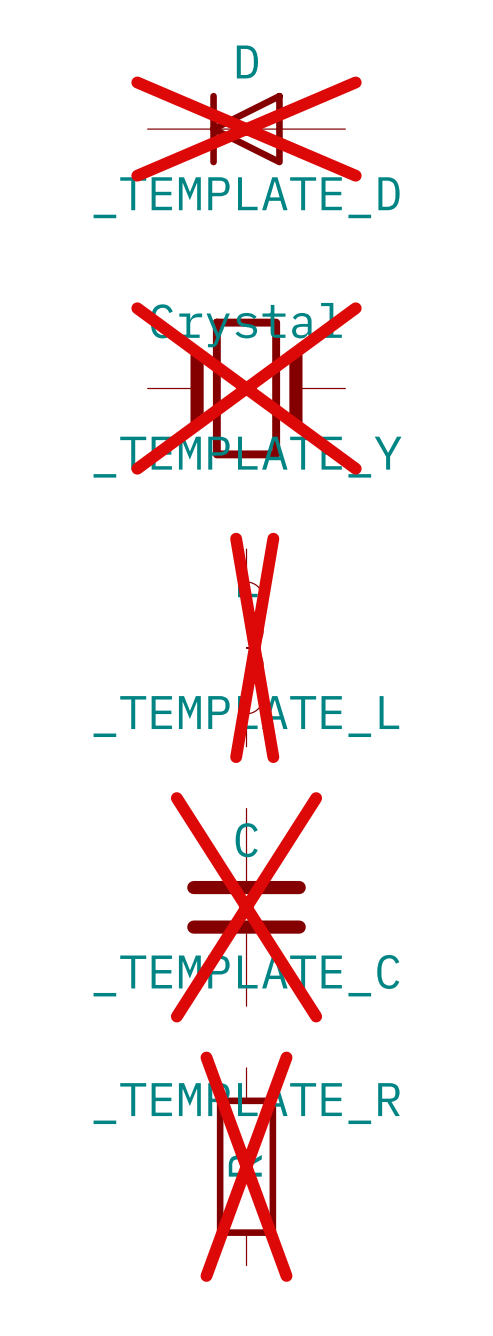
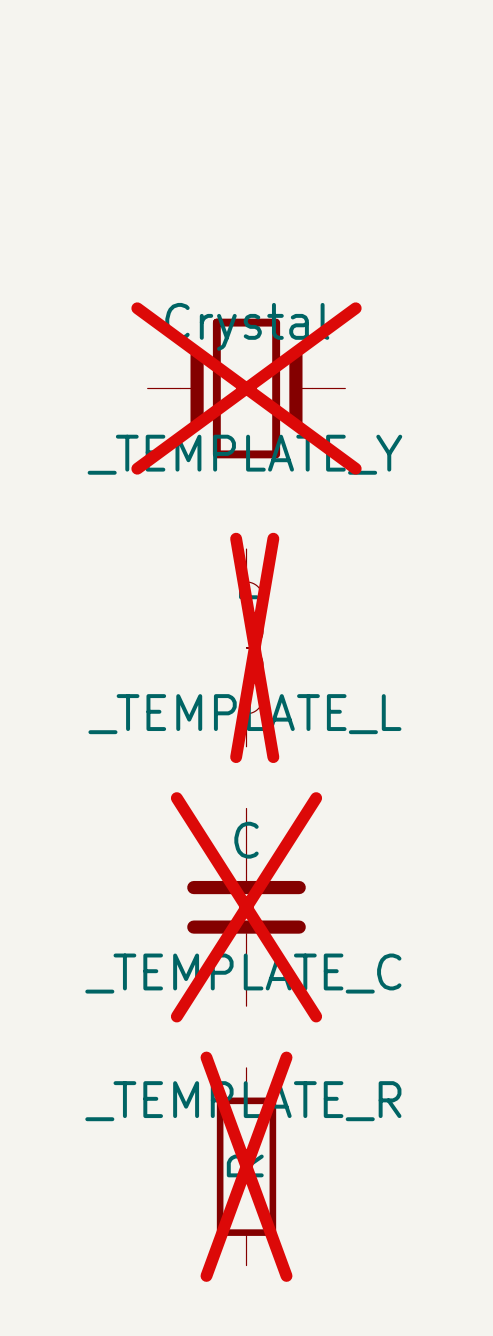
_TEMPLATE_D: D (246, 129) -> none

